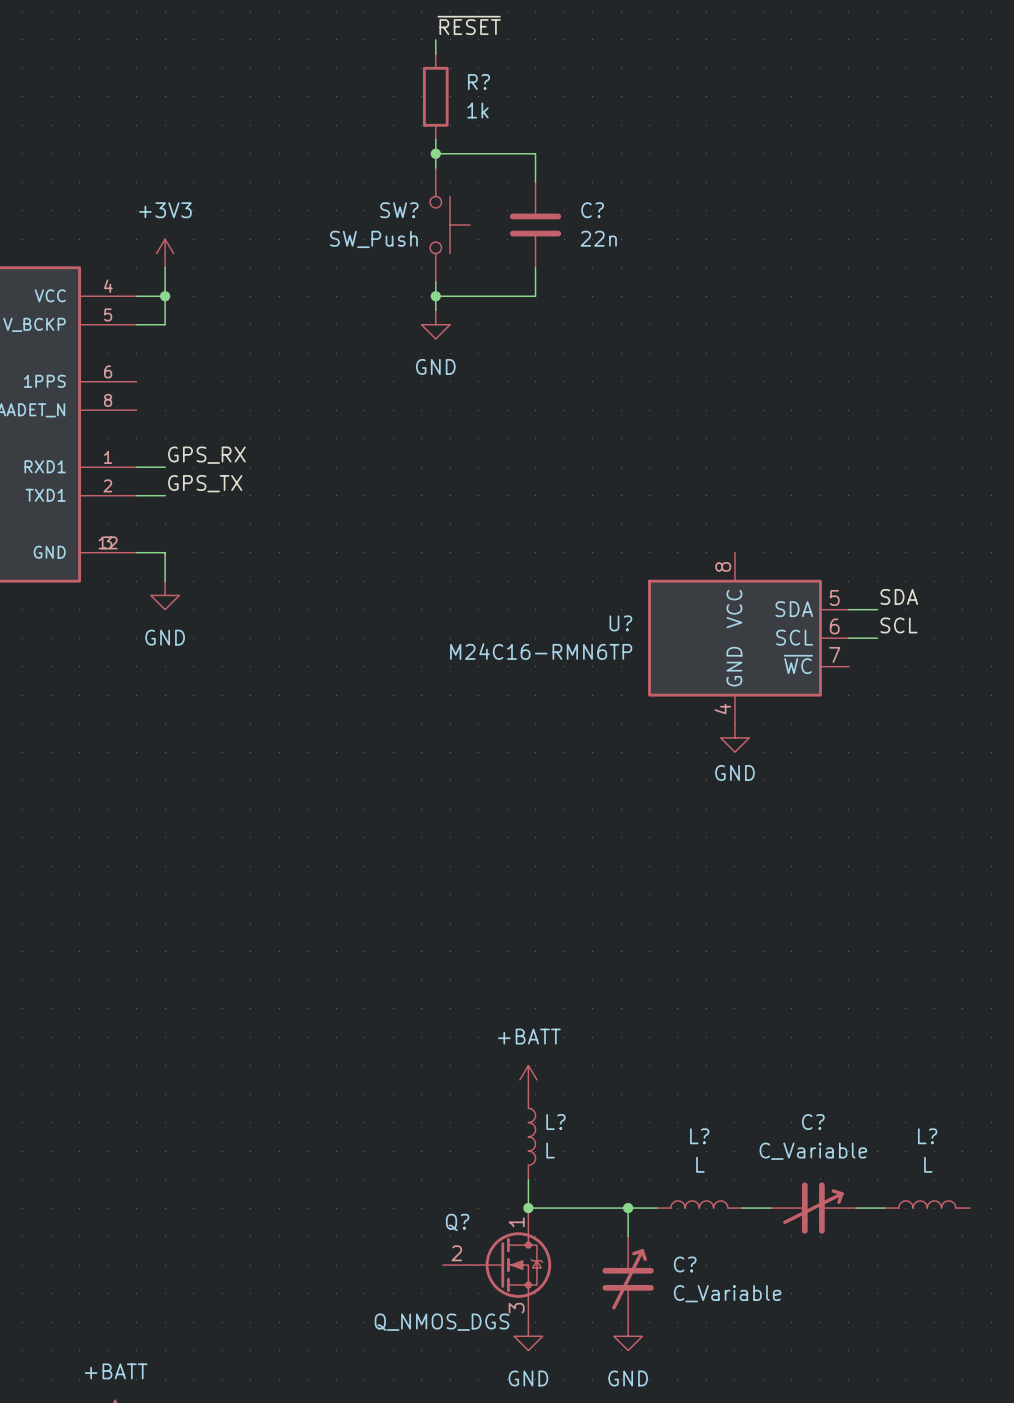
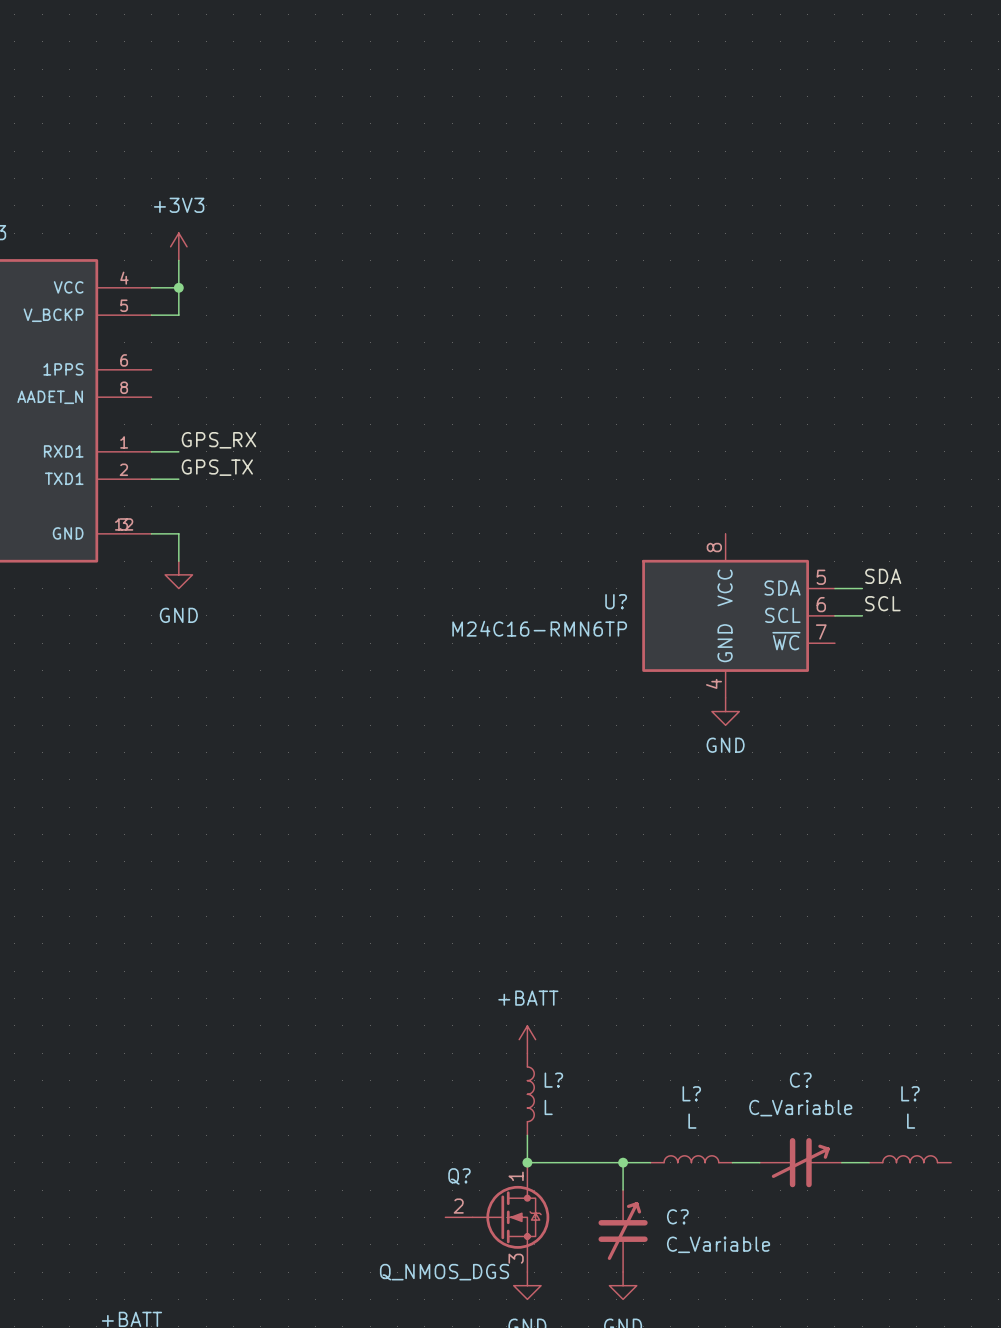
label: ~{RESET} (469, 25) -> none
wire: (435, 39) (435, 54) -> none
R?: 1k (435, 96) -> none
wire: (435, 139) (435, 168) -> none
wire: (435, 153) (535, 153) (535, 182) -> none
junction: (435, 153) -> none
SW?: SW_Push (450, 225) -> none
C?: 22n (535, 225) -> none
wire: (535, 267) (535, 296) (435, 296) -> none
wire: (435, 282) (435, 310) -> none
junction: (435, 296) -> none
power symbol: GND (435, 324) -> none

